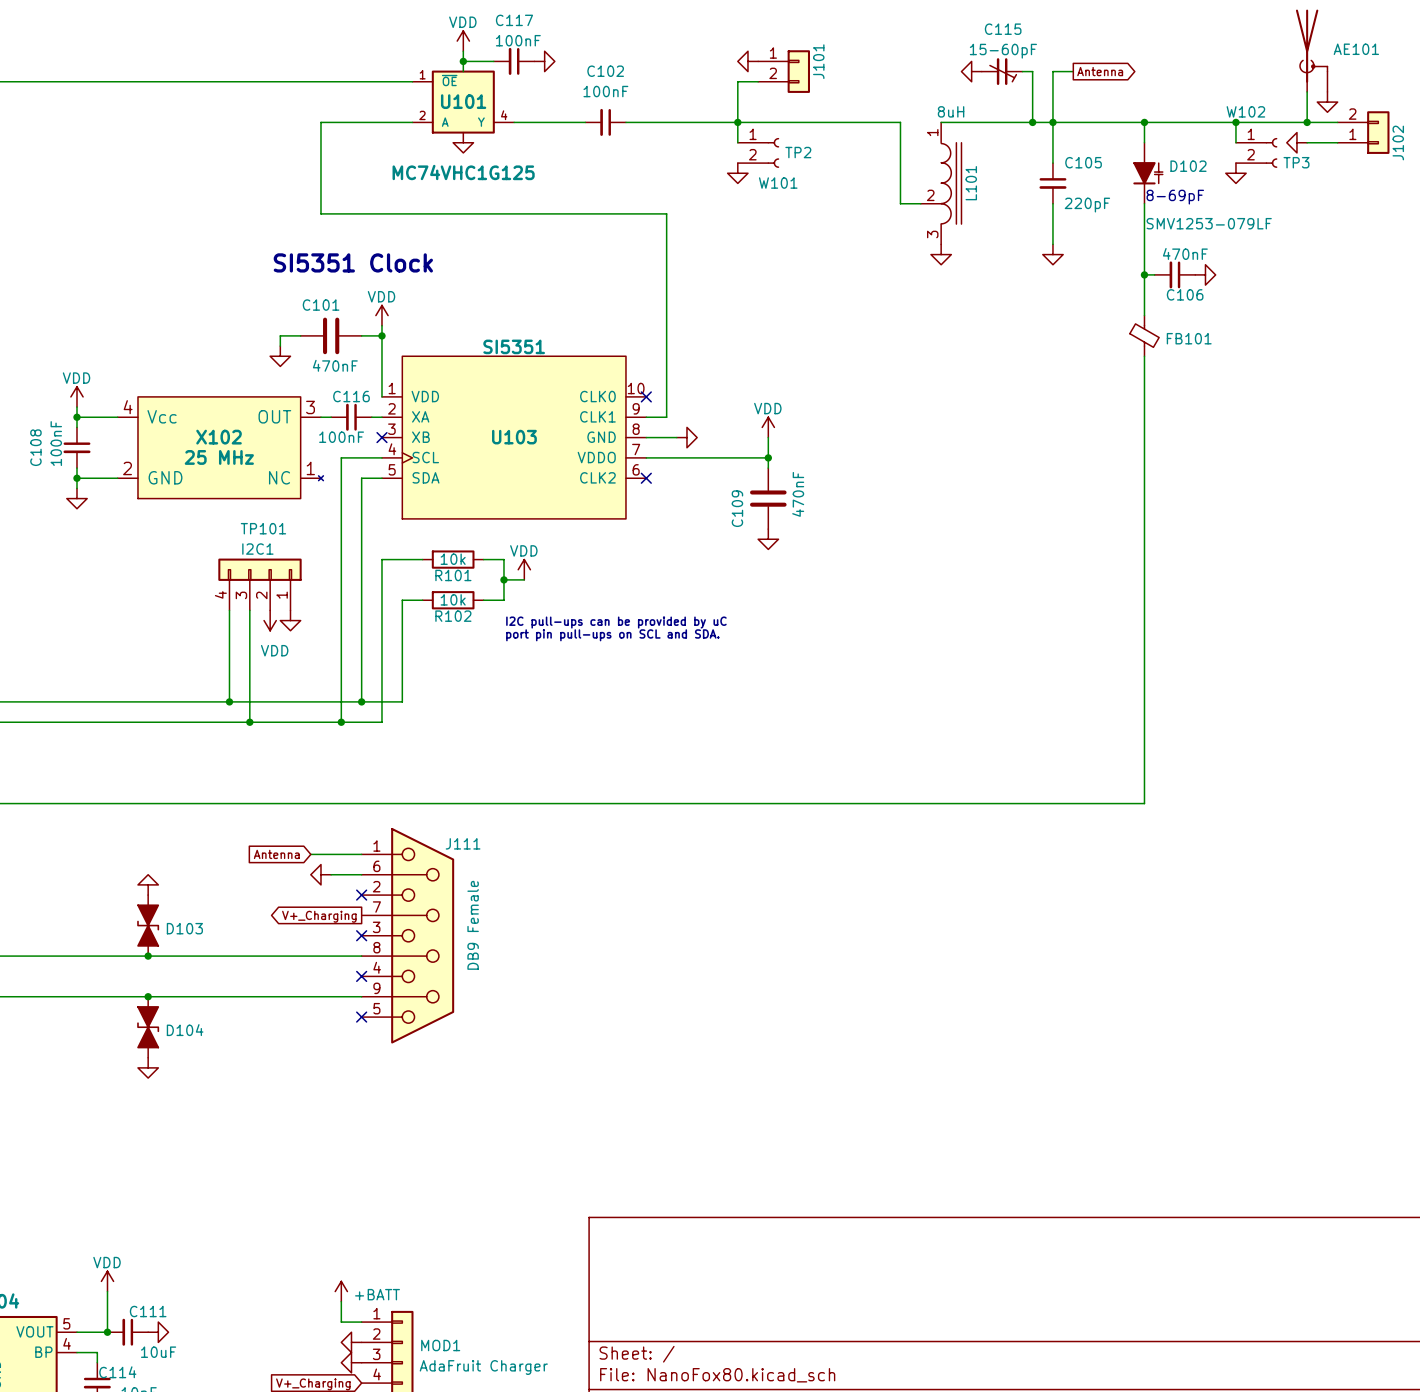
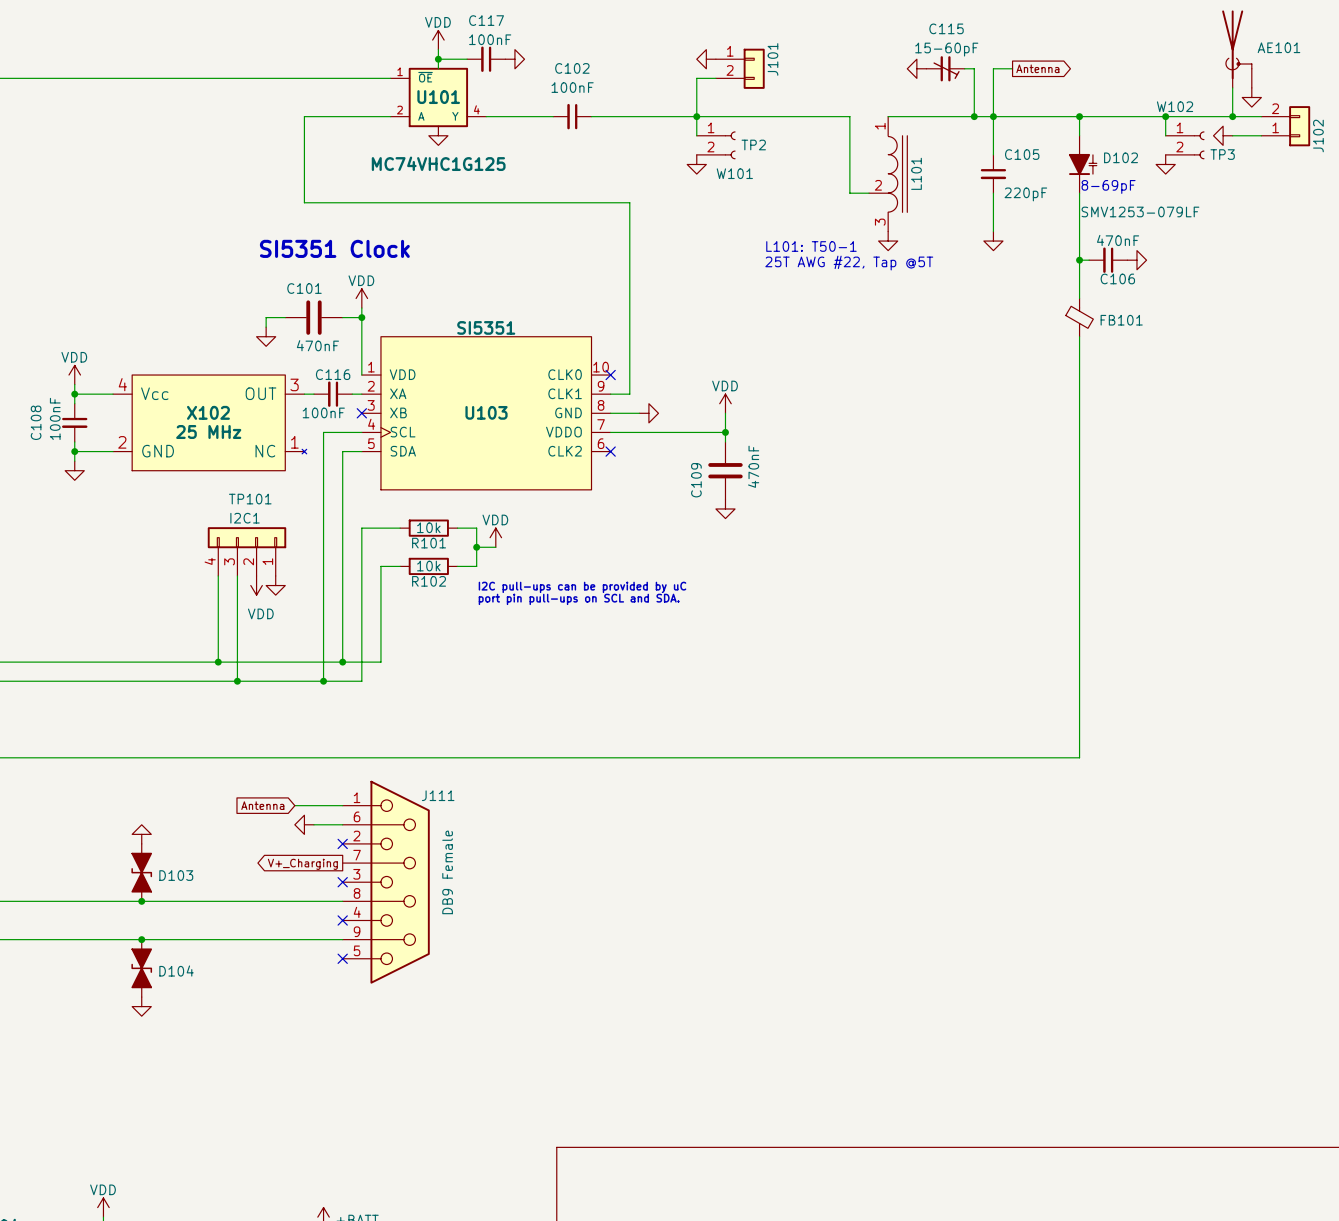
L101 value: 8uH (951, 111) -> none
text: none -> L101: T50-1 (811, 246)
text: none -> 25T AWG #22, Tap @5T (849, 263)

